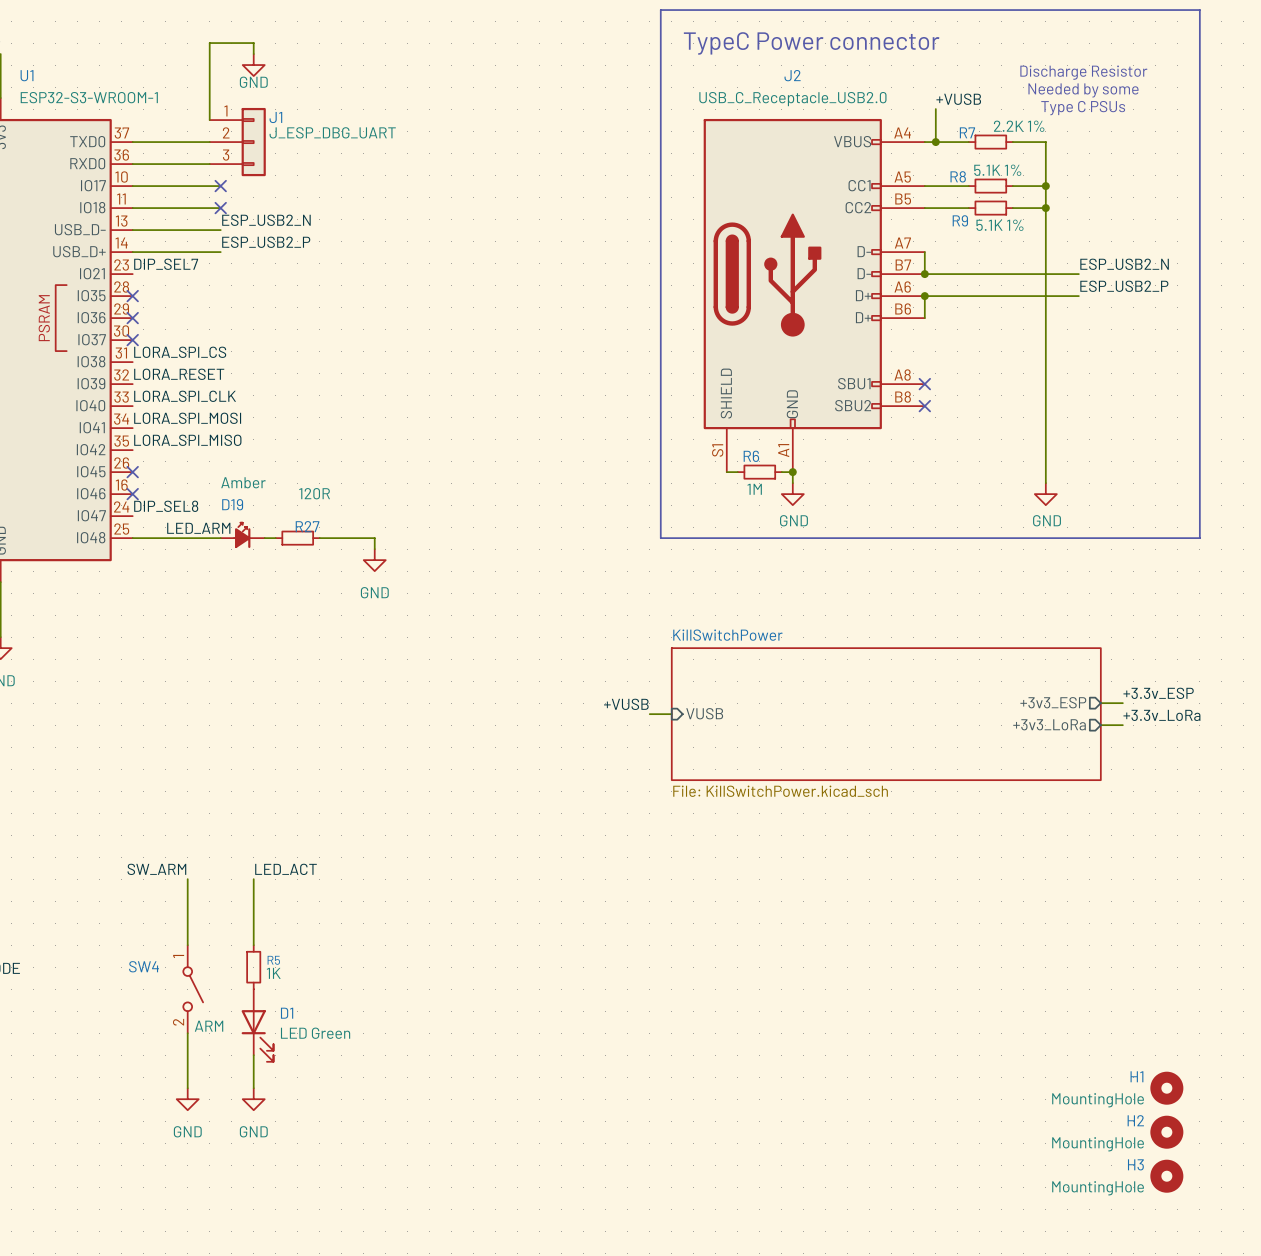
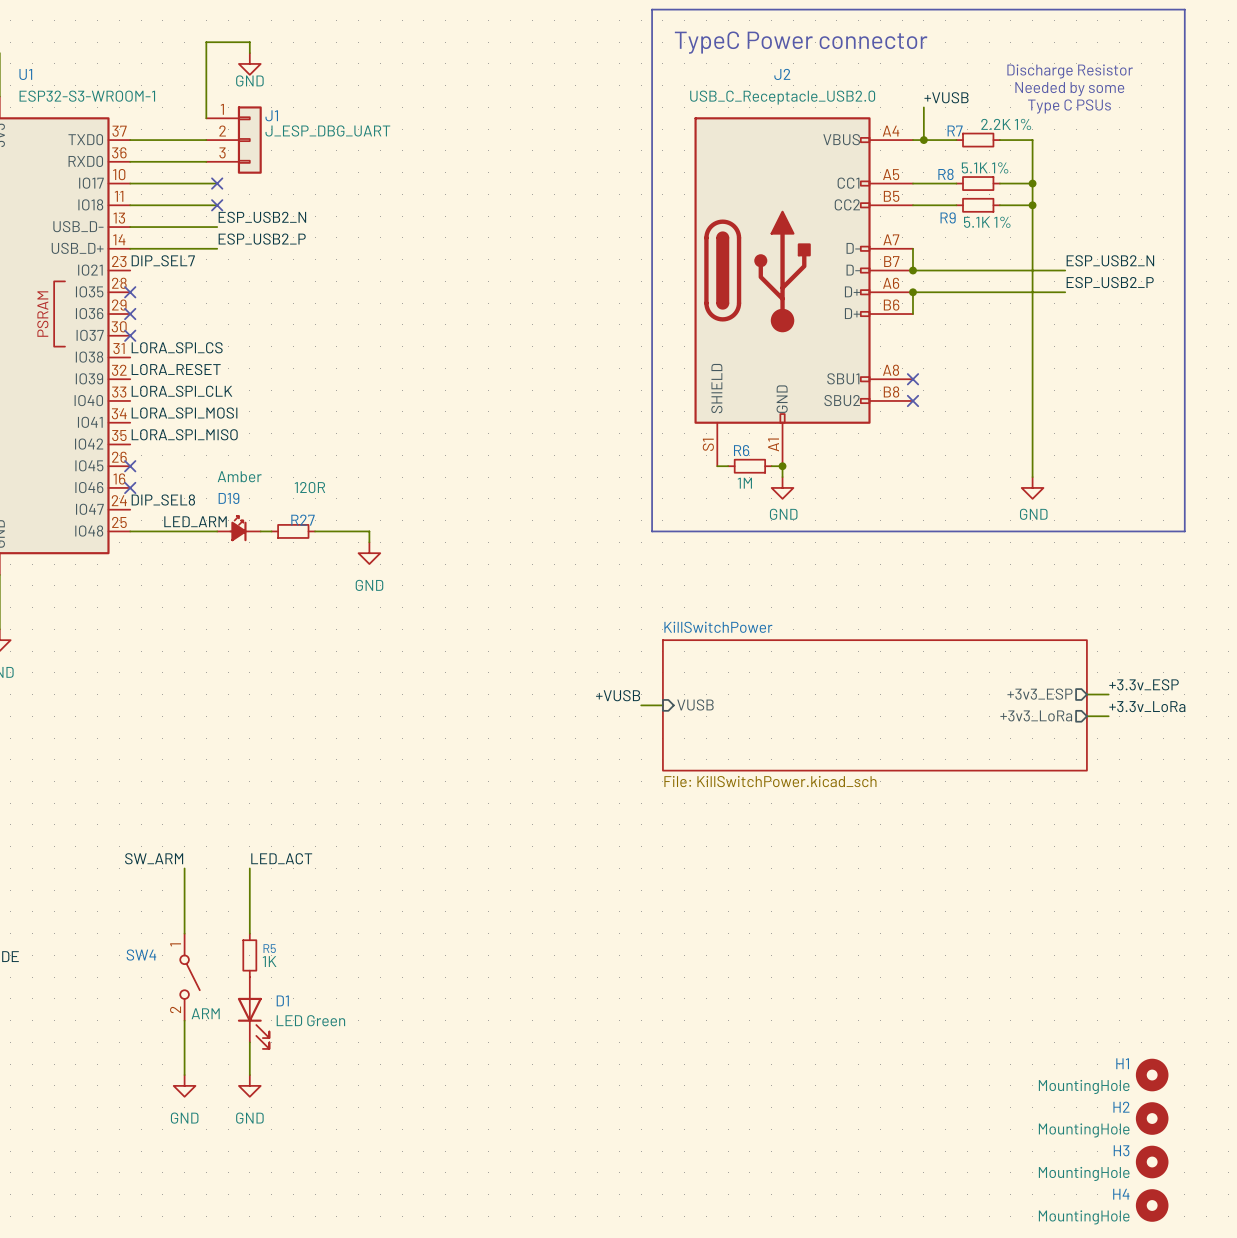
H4: none -> MountingHole (1152, 1205)

